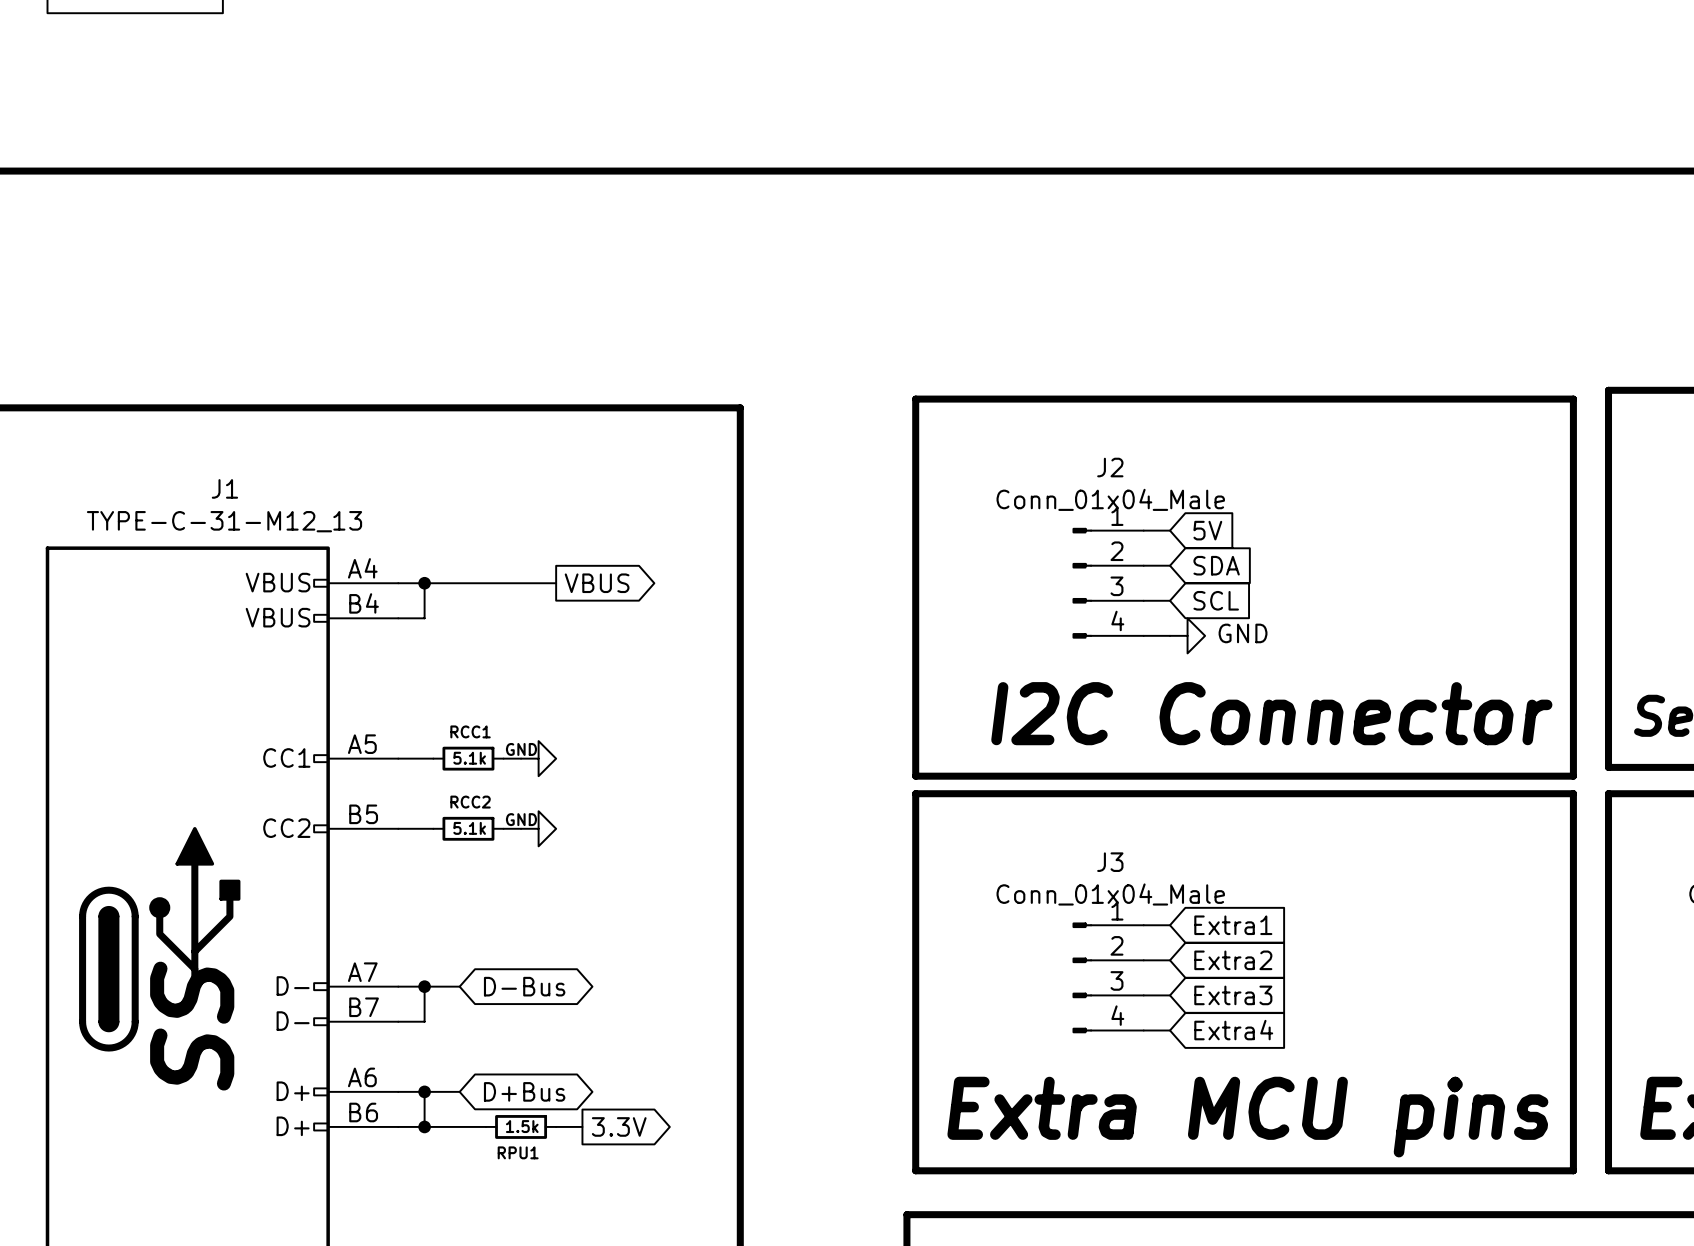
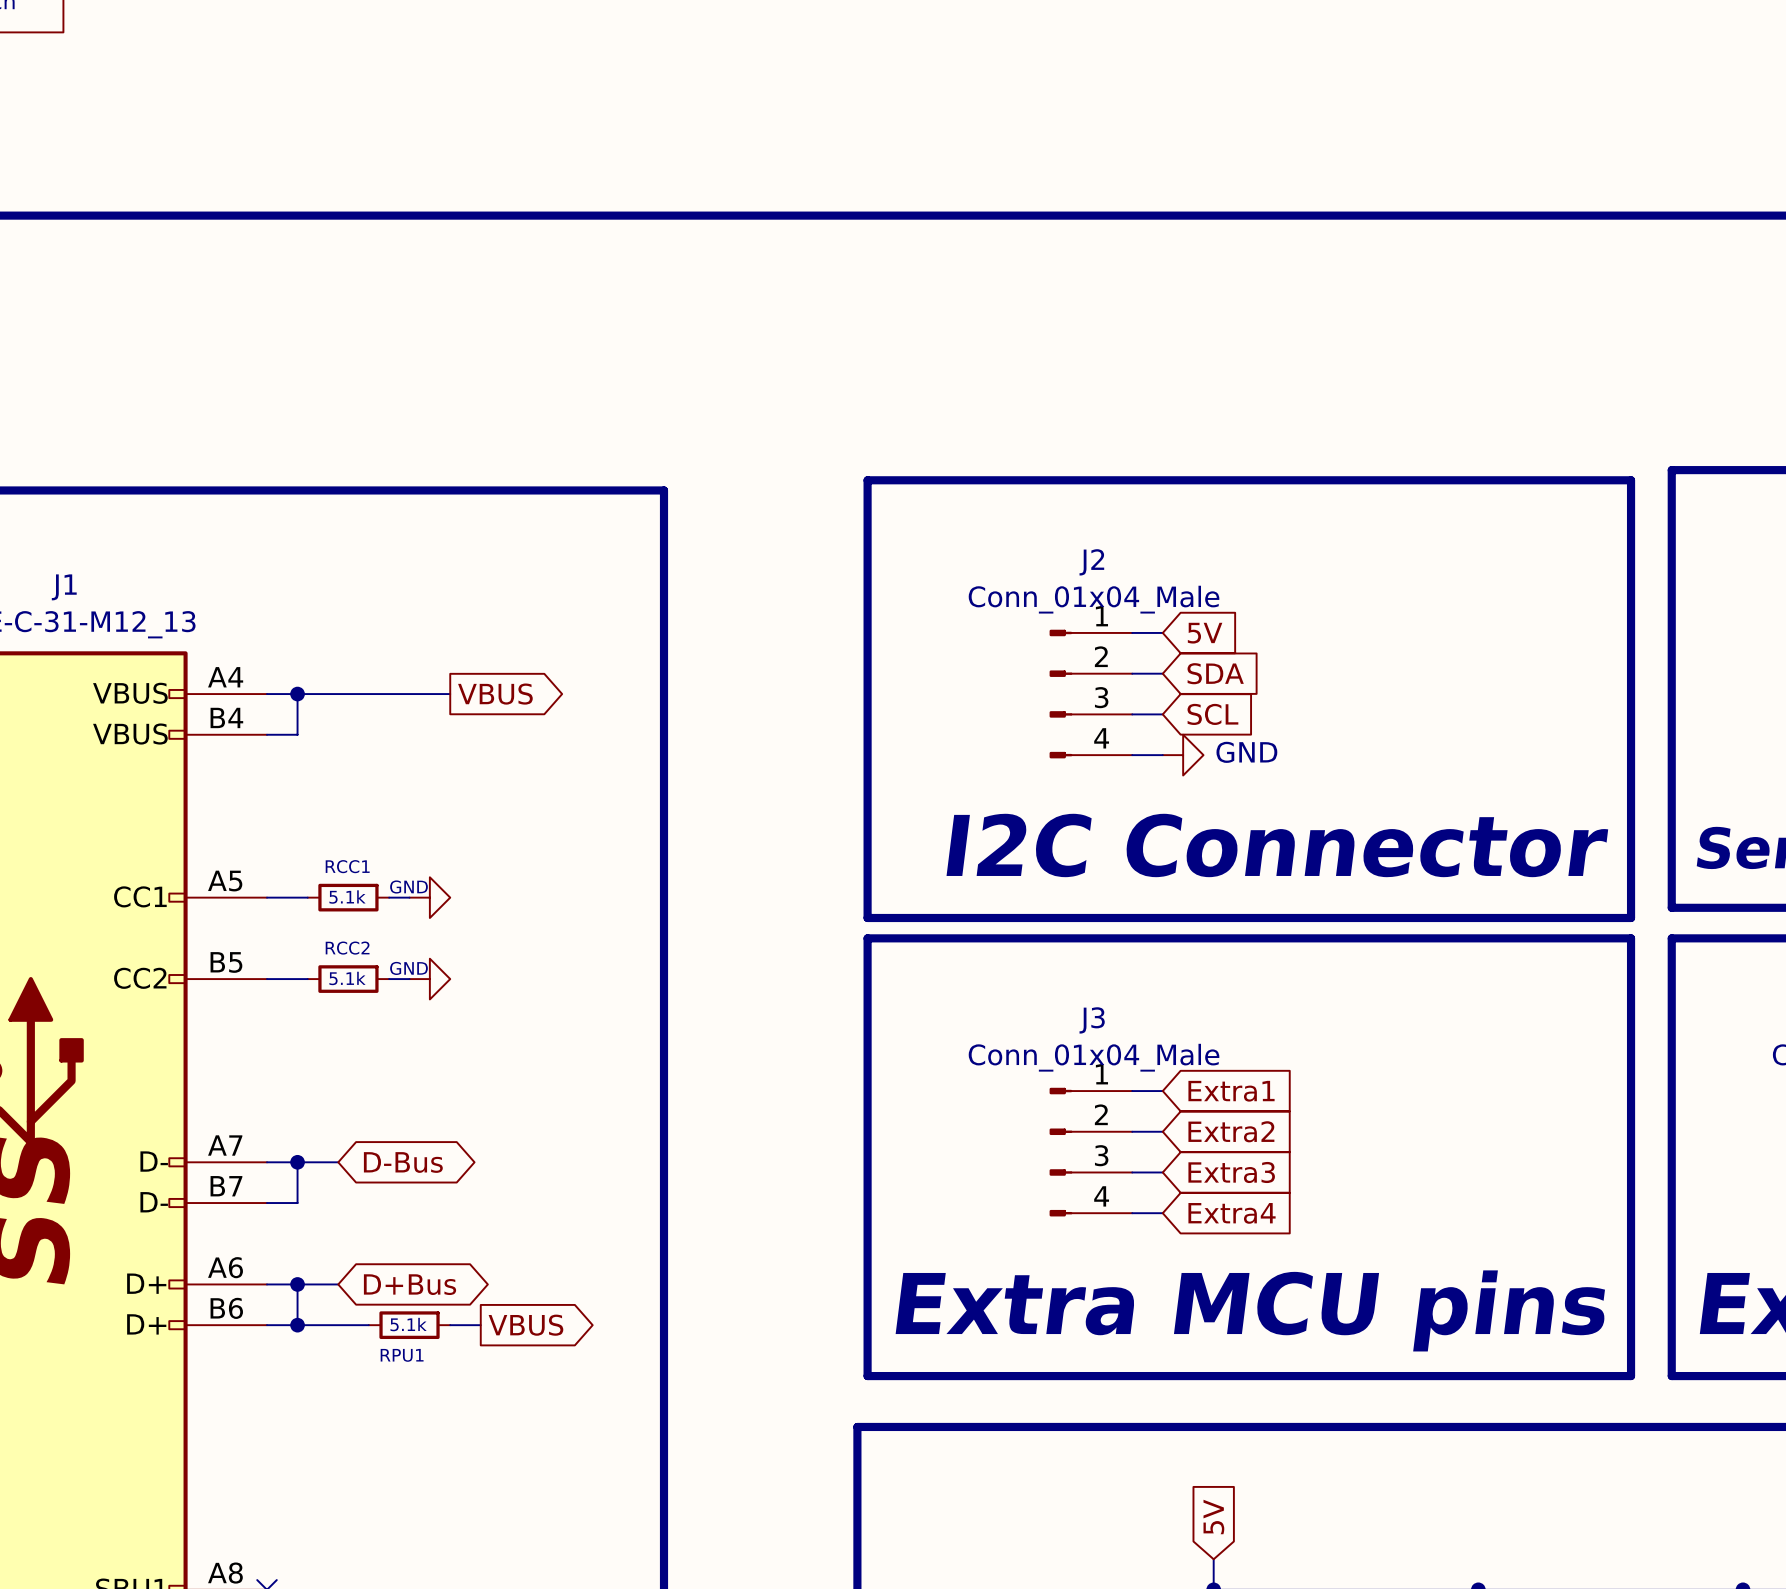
RPU1 value: 1.5k (522, 1126) -> 5.1k (408, 1324)
global label: 3.3V (619, 1126) -> VBUS (525, 1325)

